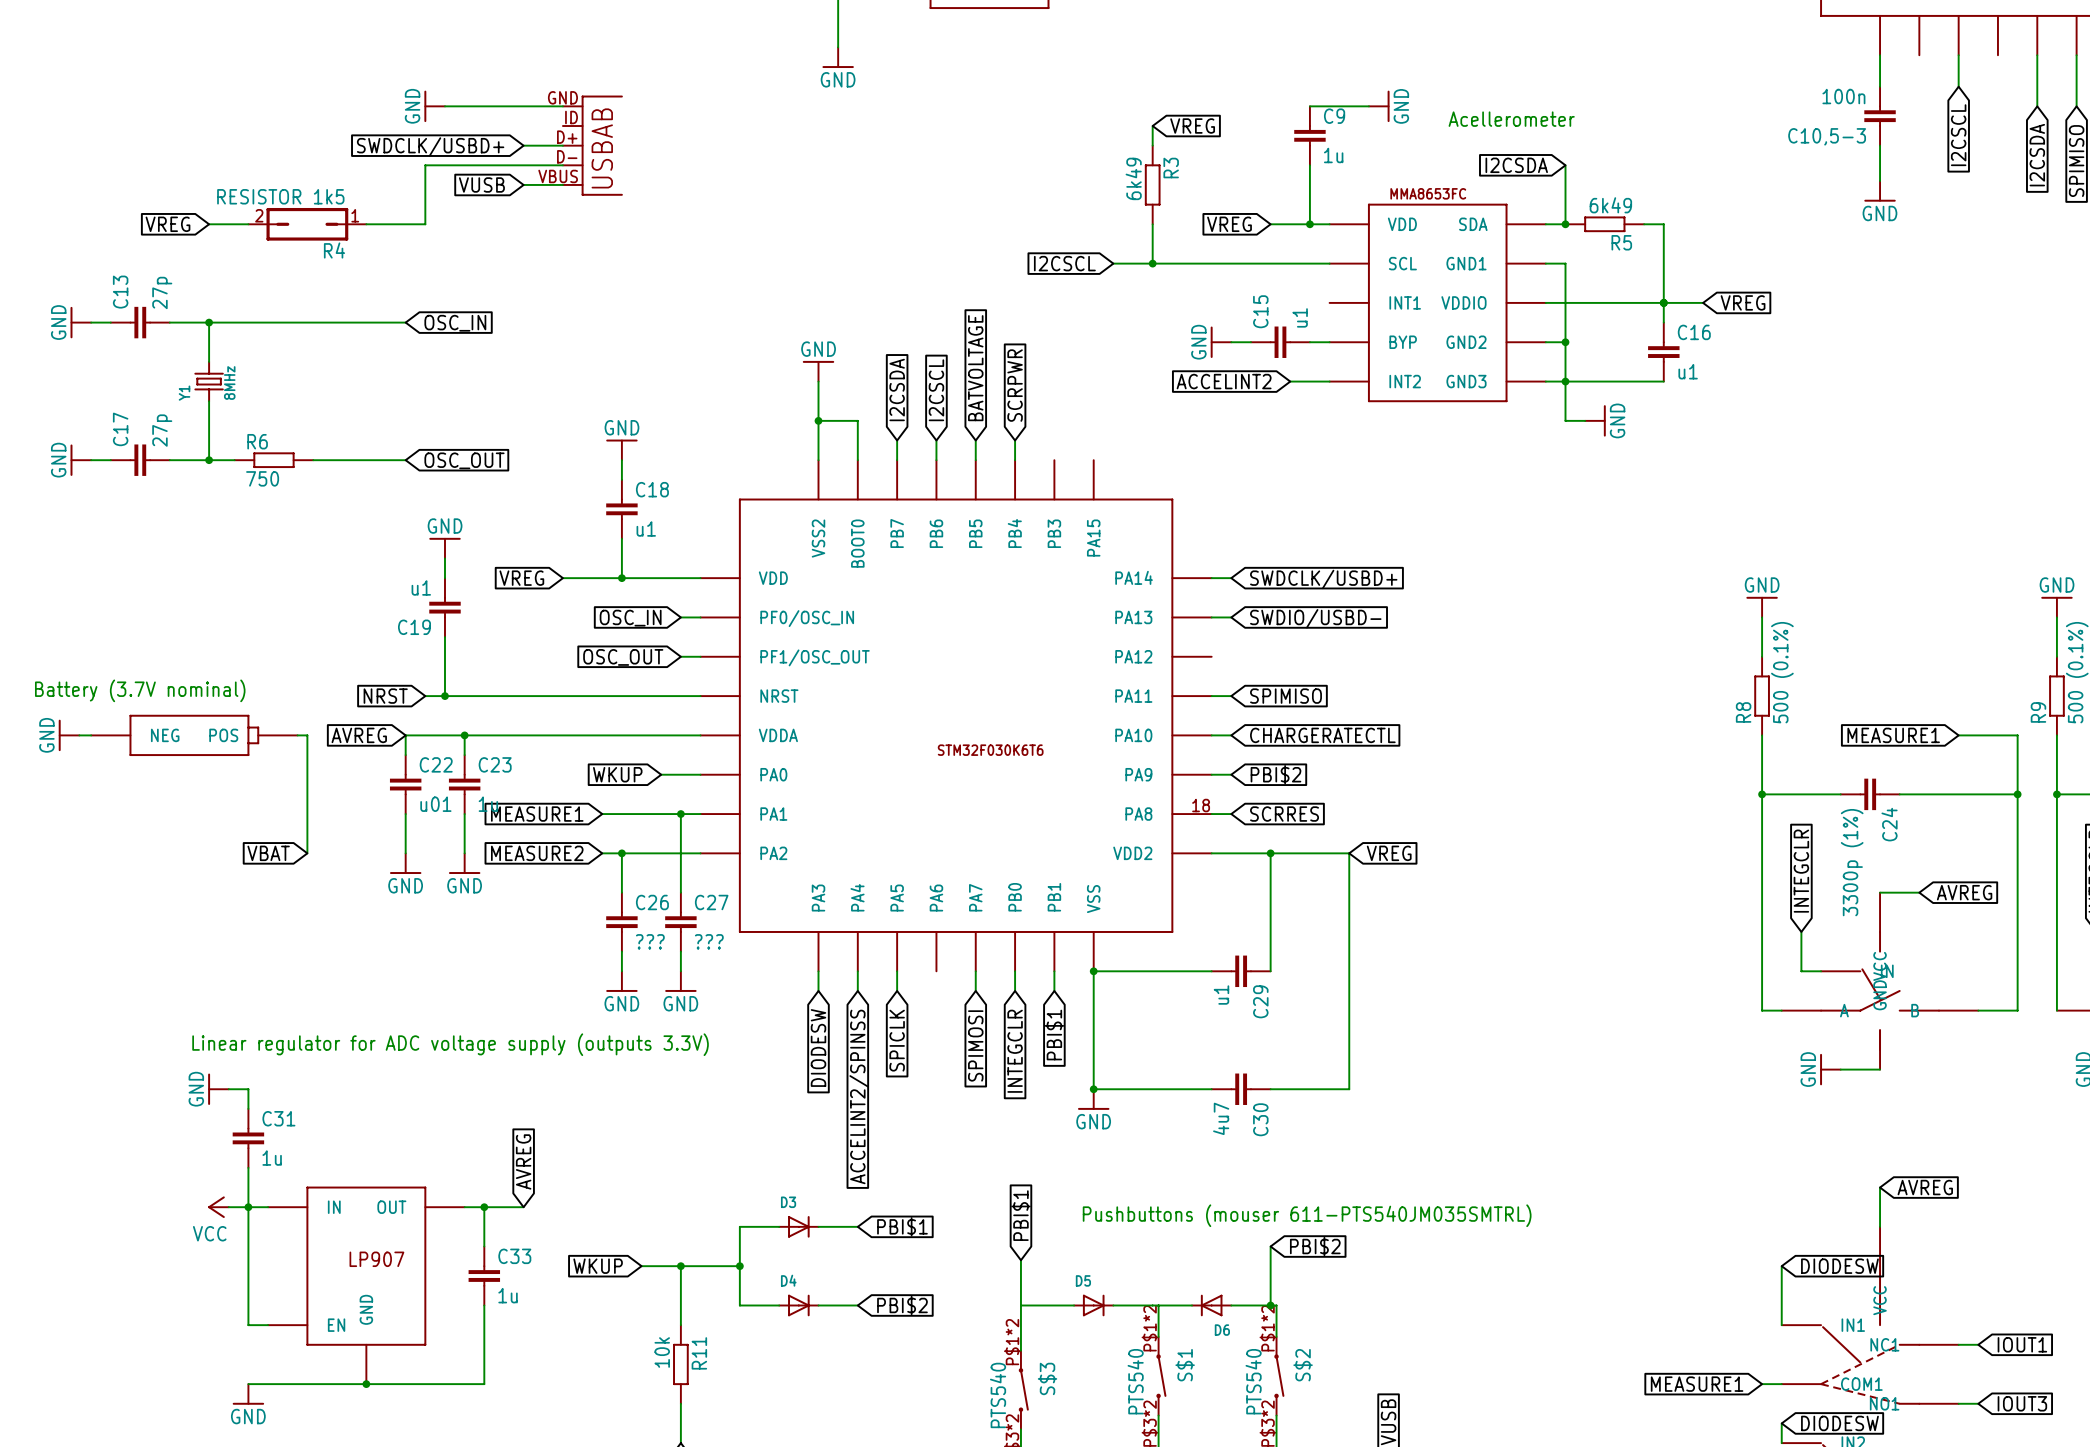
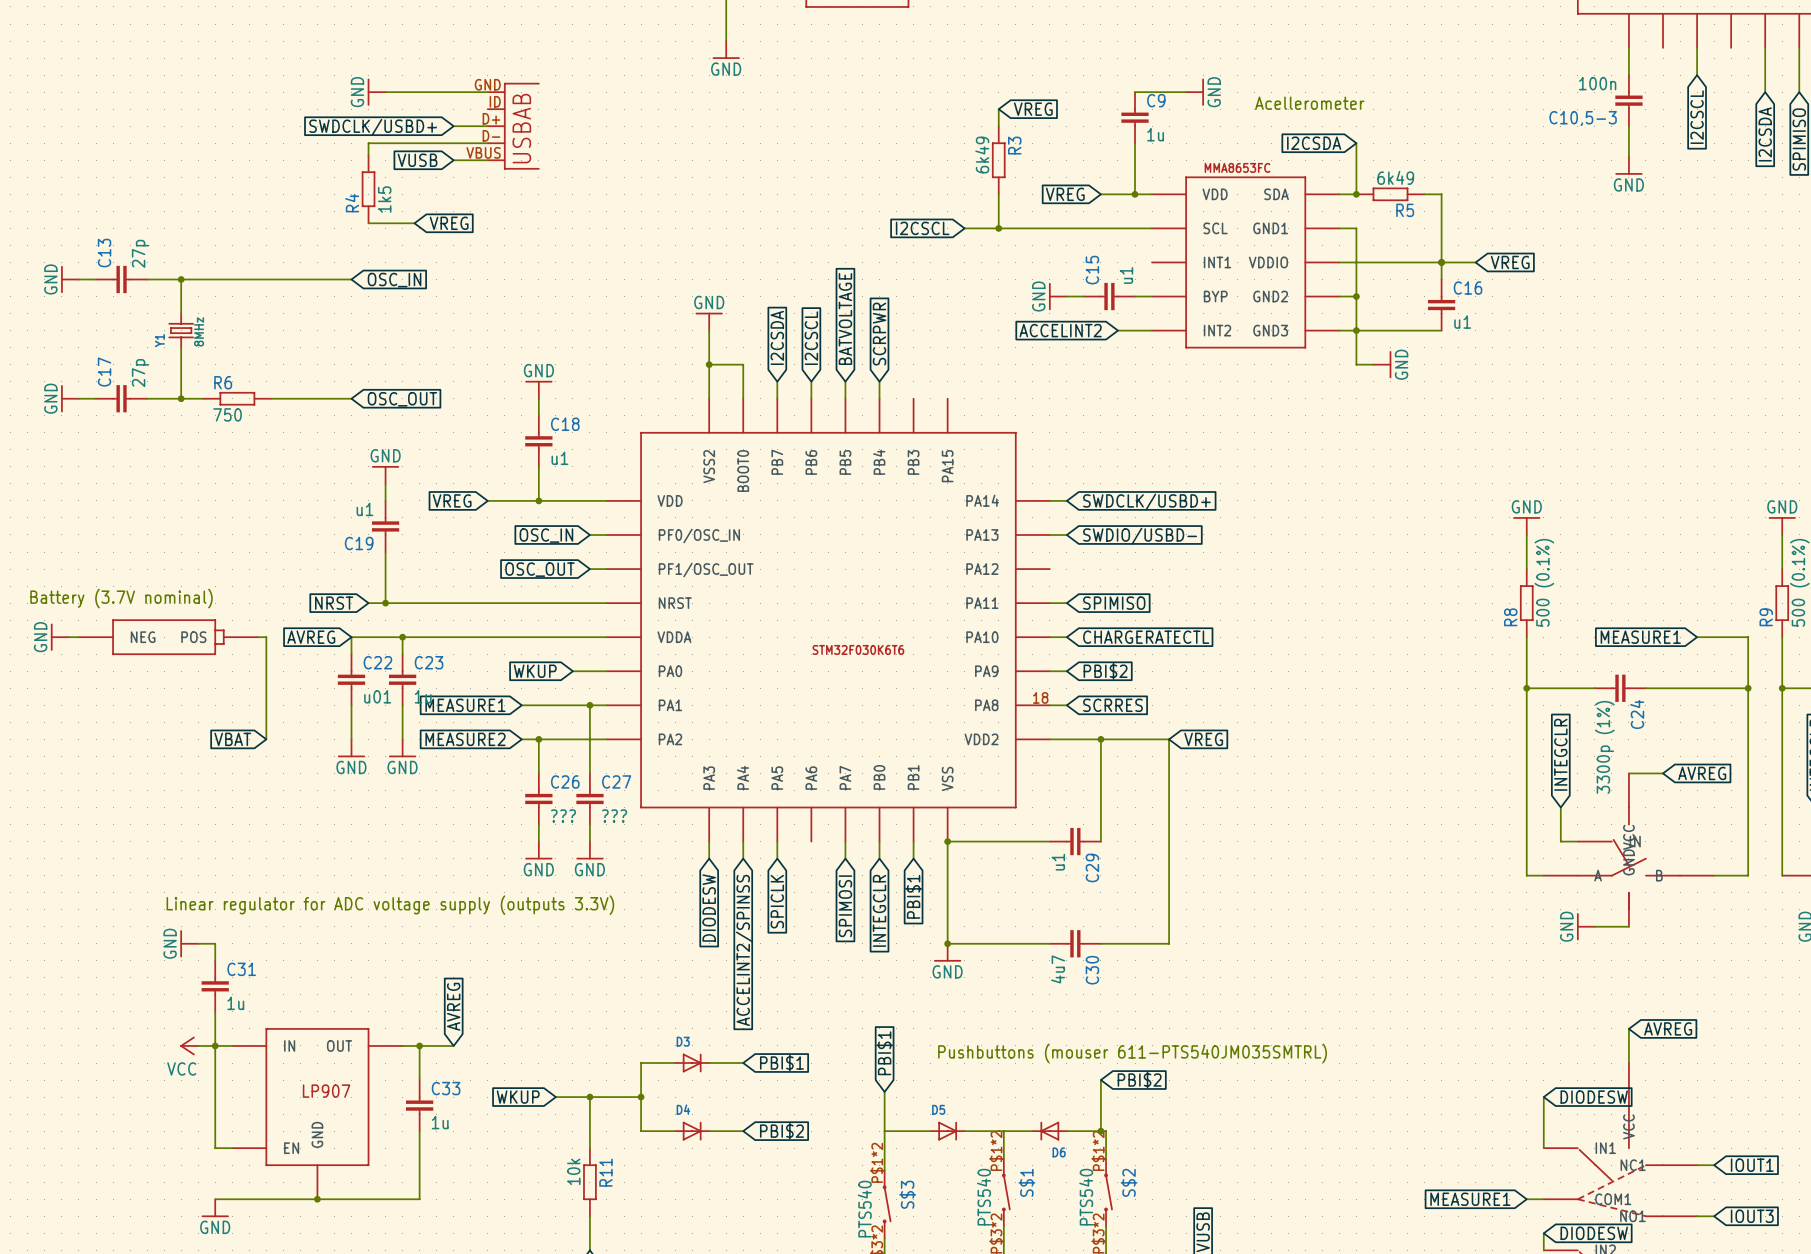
wire: (425, 179) (425, 224) (366, 224) -> none
R4 value: RESISTOR 1k5 (280, 196) -> 1k5 (384, 199)
R4 symbol: [248, 207, 367, 241] -> [361, 155, 376, 224]
global label: VREG (167, 224) -> none
wire: (209, 224) (248, 224) -> none
R4 name position: R4 (334, 250) -> R4 (352, 203)
wire: none -> (368, 223) (414, 223)
global label: none -> VREG (449, 223)

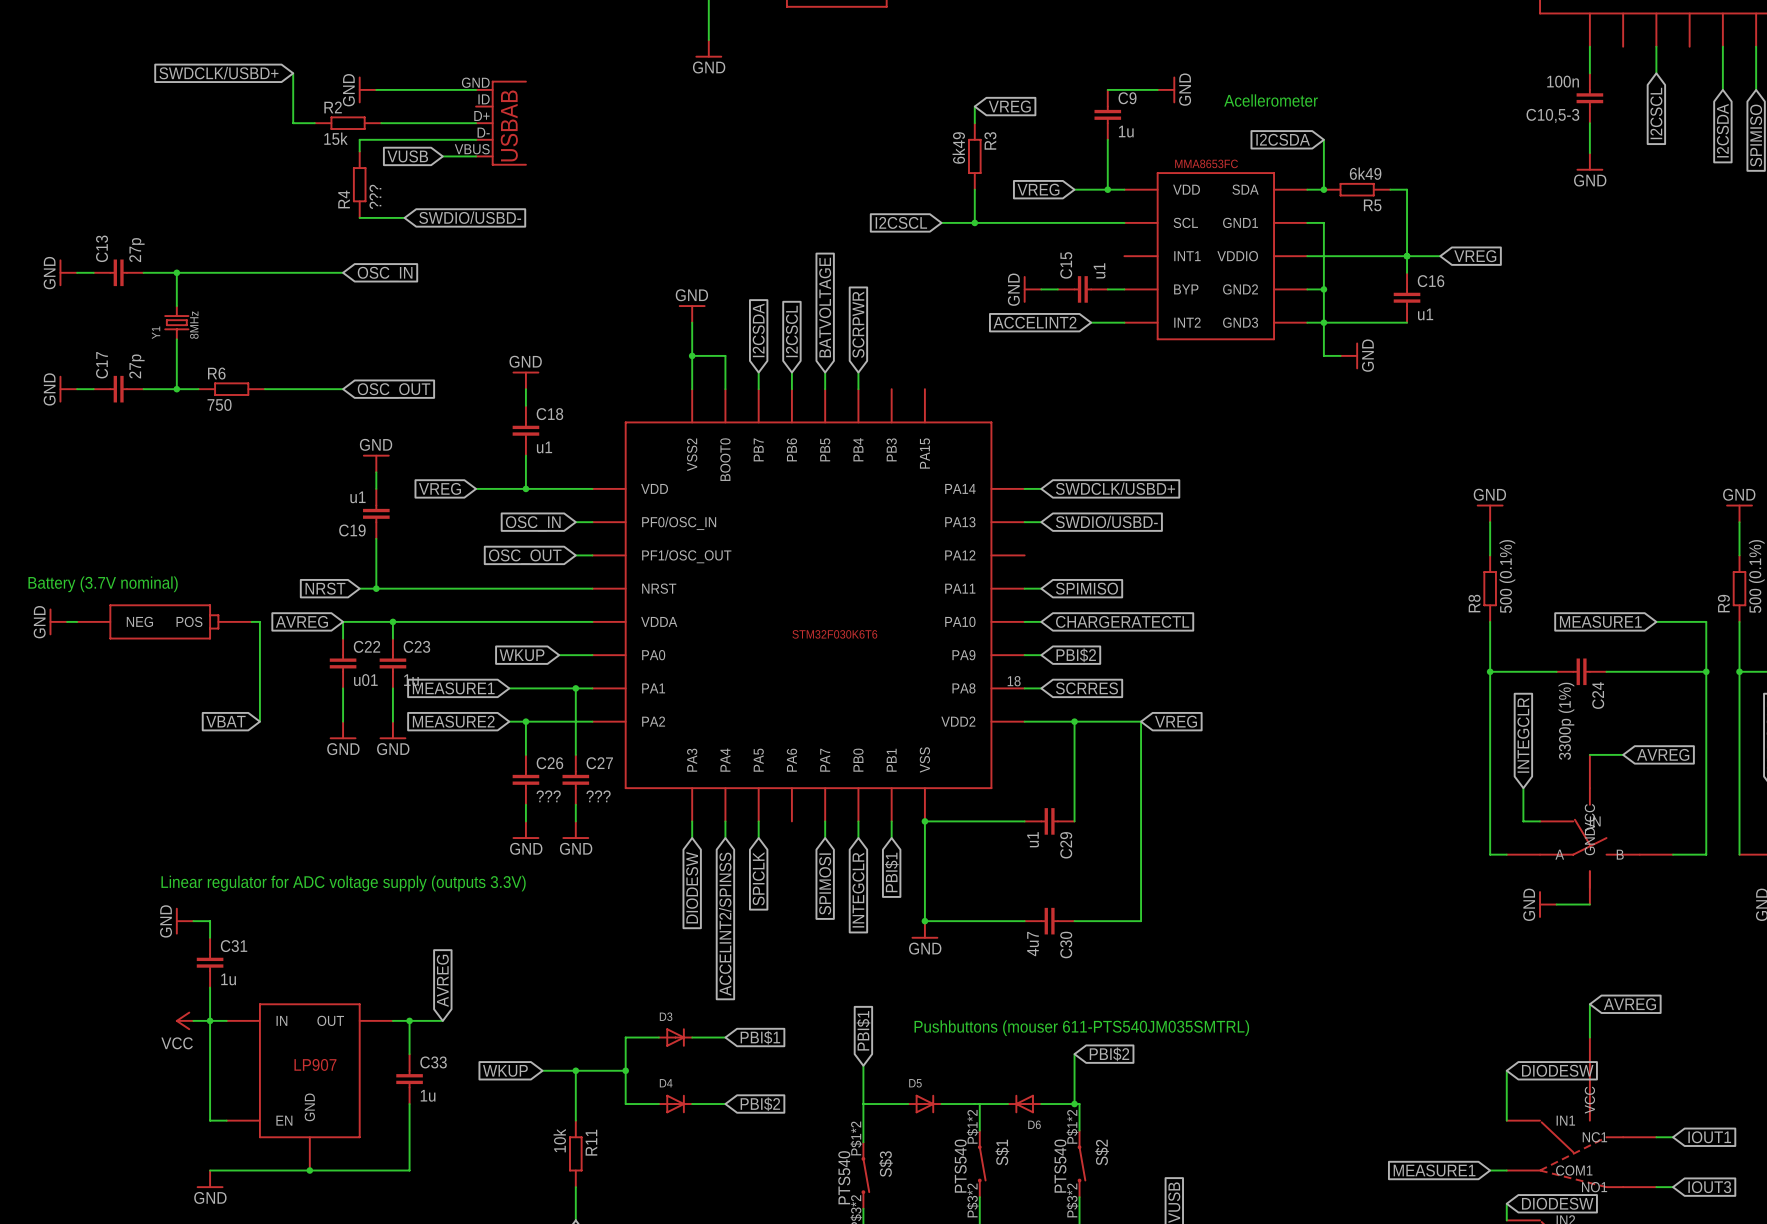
wire: none -> (293, 73) (293, 123) (314, 123)
R2: none -> 15k (348, 123)
wire: none -> (381, 123) (442, 123)
global label position: SWDCLK/USBD+ (373, 127) -> SWDCLK/USBD+ (218, 73)
R4 value: 1k5 (384, 199) -> ??? (375, 196)
global label: VREG (449, 223) -> SWDIO/USBD- (470, 217)

